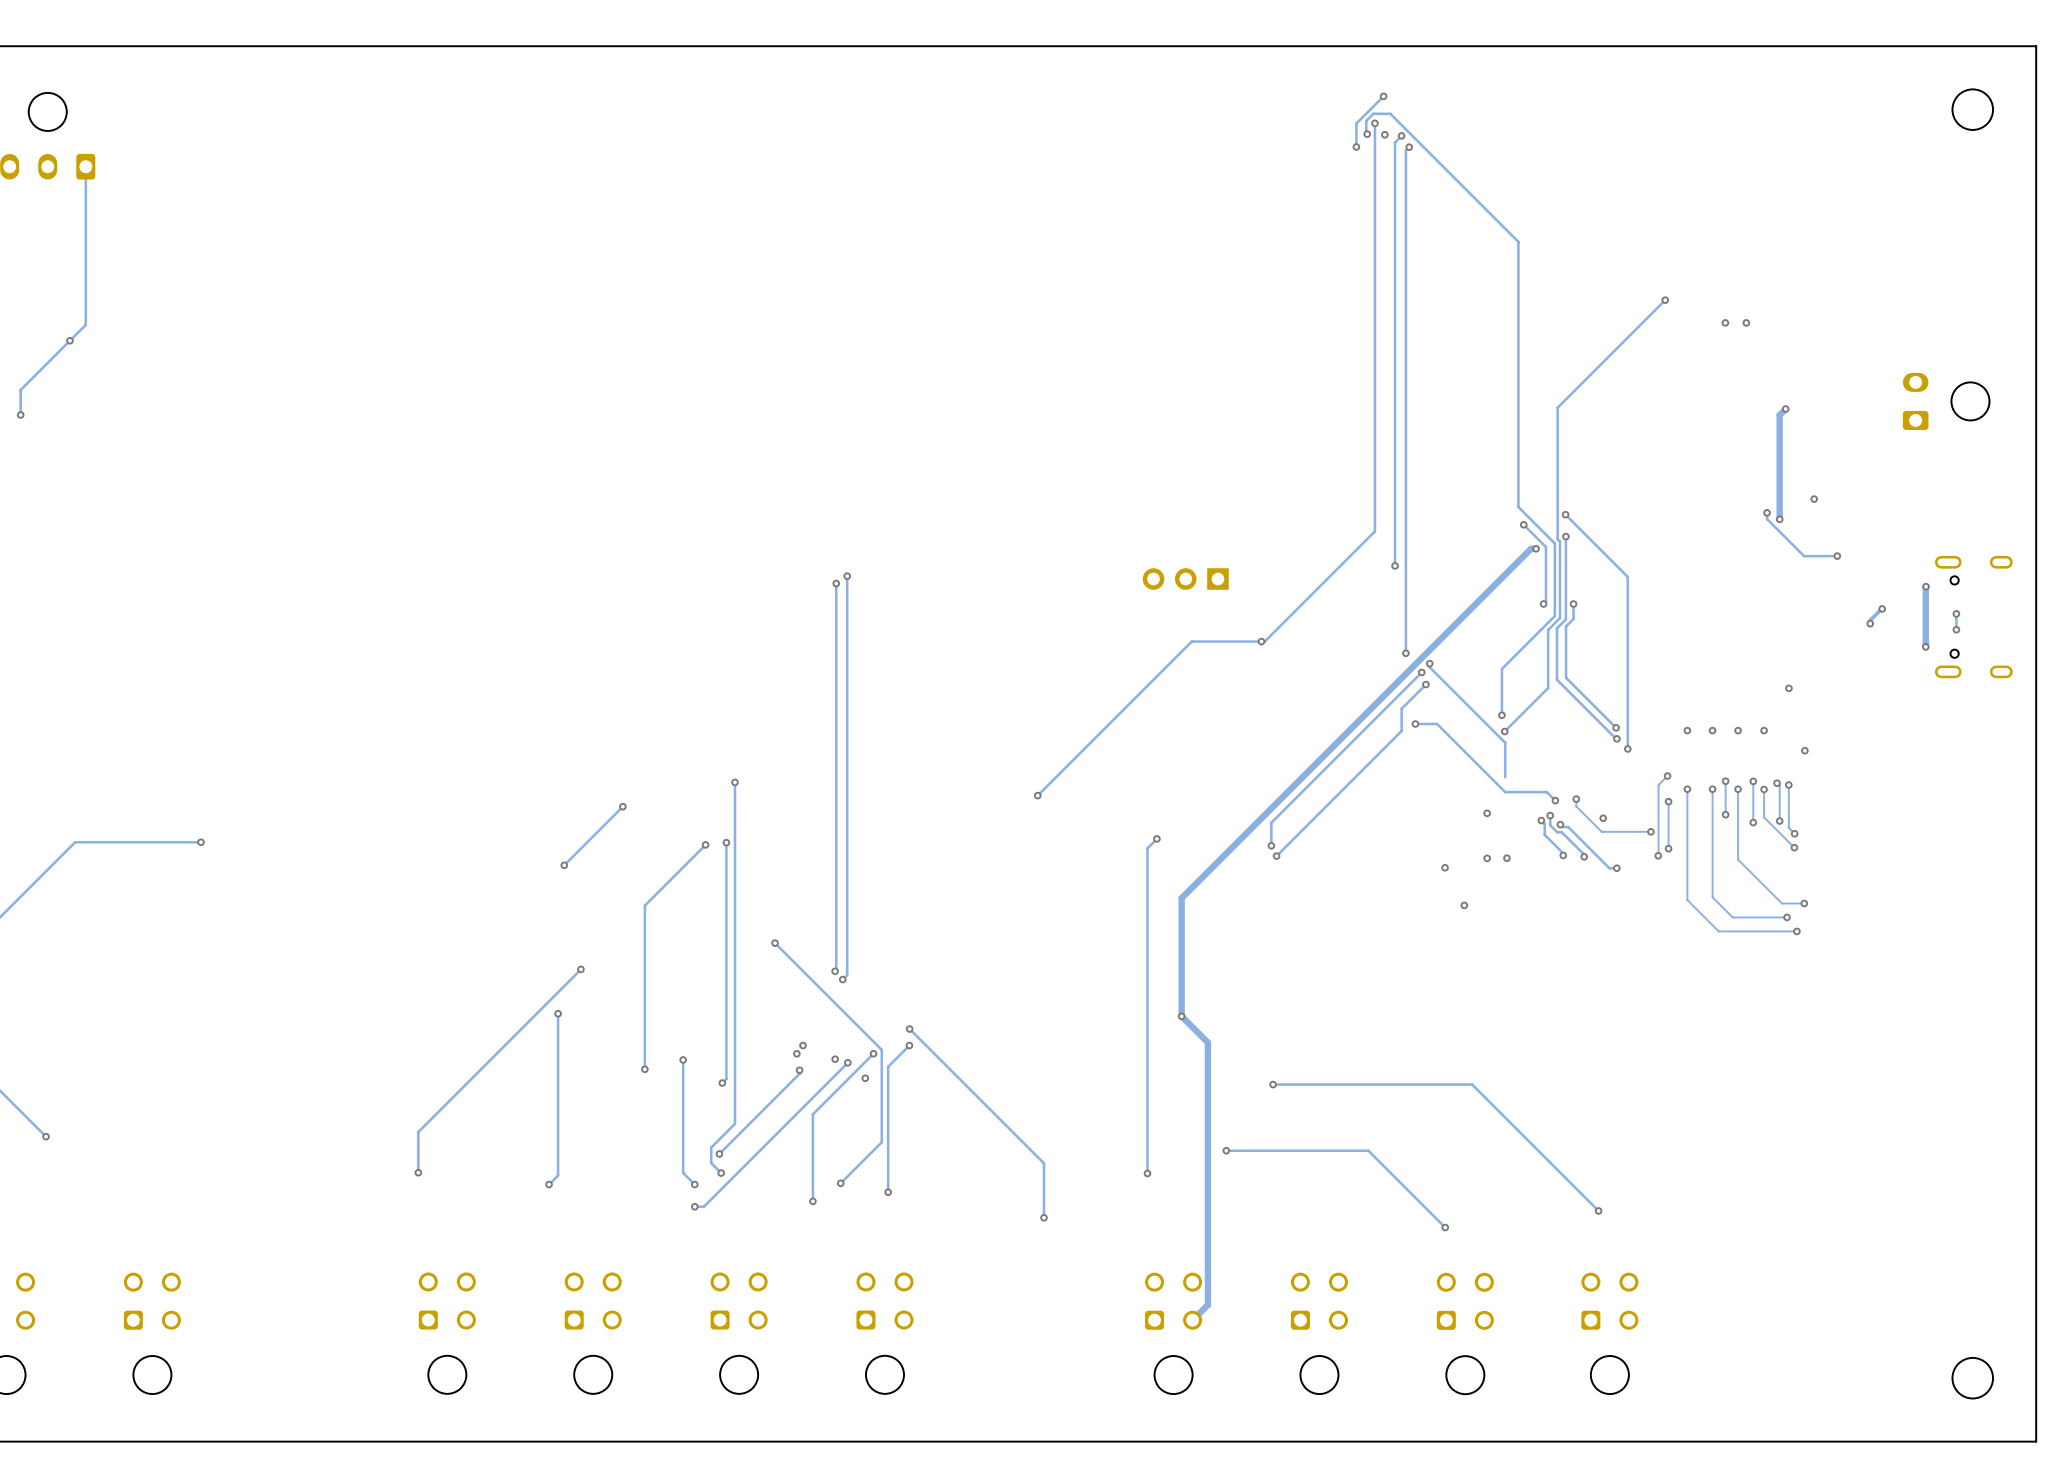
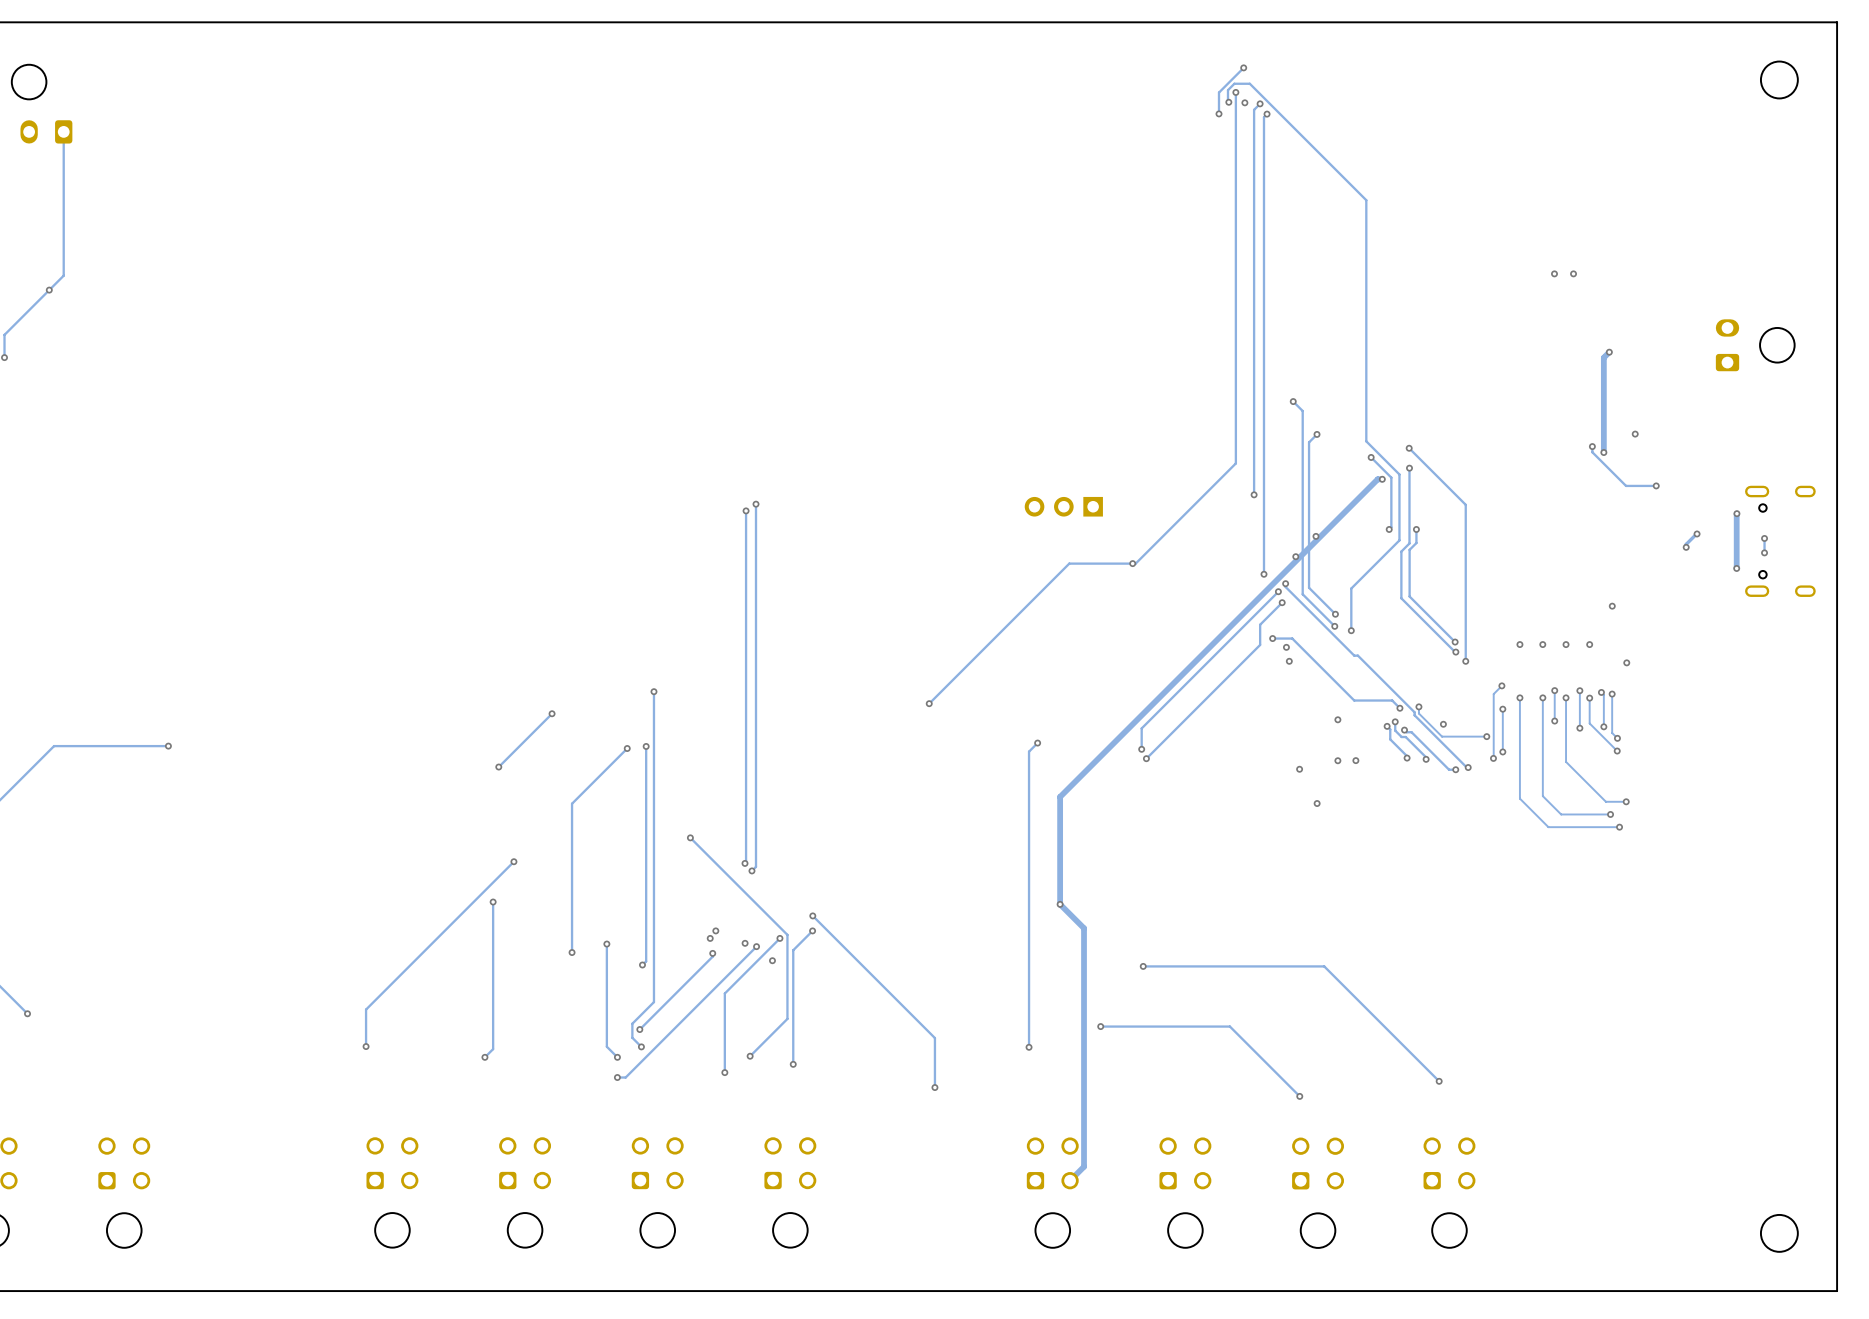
track: (1665, 300) (1557, 407) (1559, 618) (1548, 629) (1548, 688) (1504, 731) -> none
via: (1665, 300) -> none
track: none -> (1293, 401) (1302, 411) (1302, 594) (1334, 626)
via: none -> (1293, 401)
track: none -> (1317, 434) (1309, 442) (1309, 587) (1335, 614)
via: none -> (1317, 434)
via: none -> (1315, 536)
via: none -> (1295, 556)
via: none -> (1335, 614)
via: none -> (1334, 626)
via: (1504, 731) -> none
via: none -> (1286, 647)
track: (1505, 742) (1505, 777) -> (1354, 655) (1357, 655) (1414, 712) (1414, 715) (1468, 767)
via: none -> (1289, 661)
via: none -> (1468, 767)

